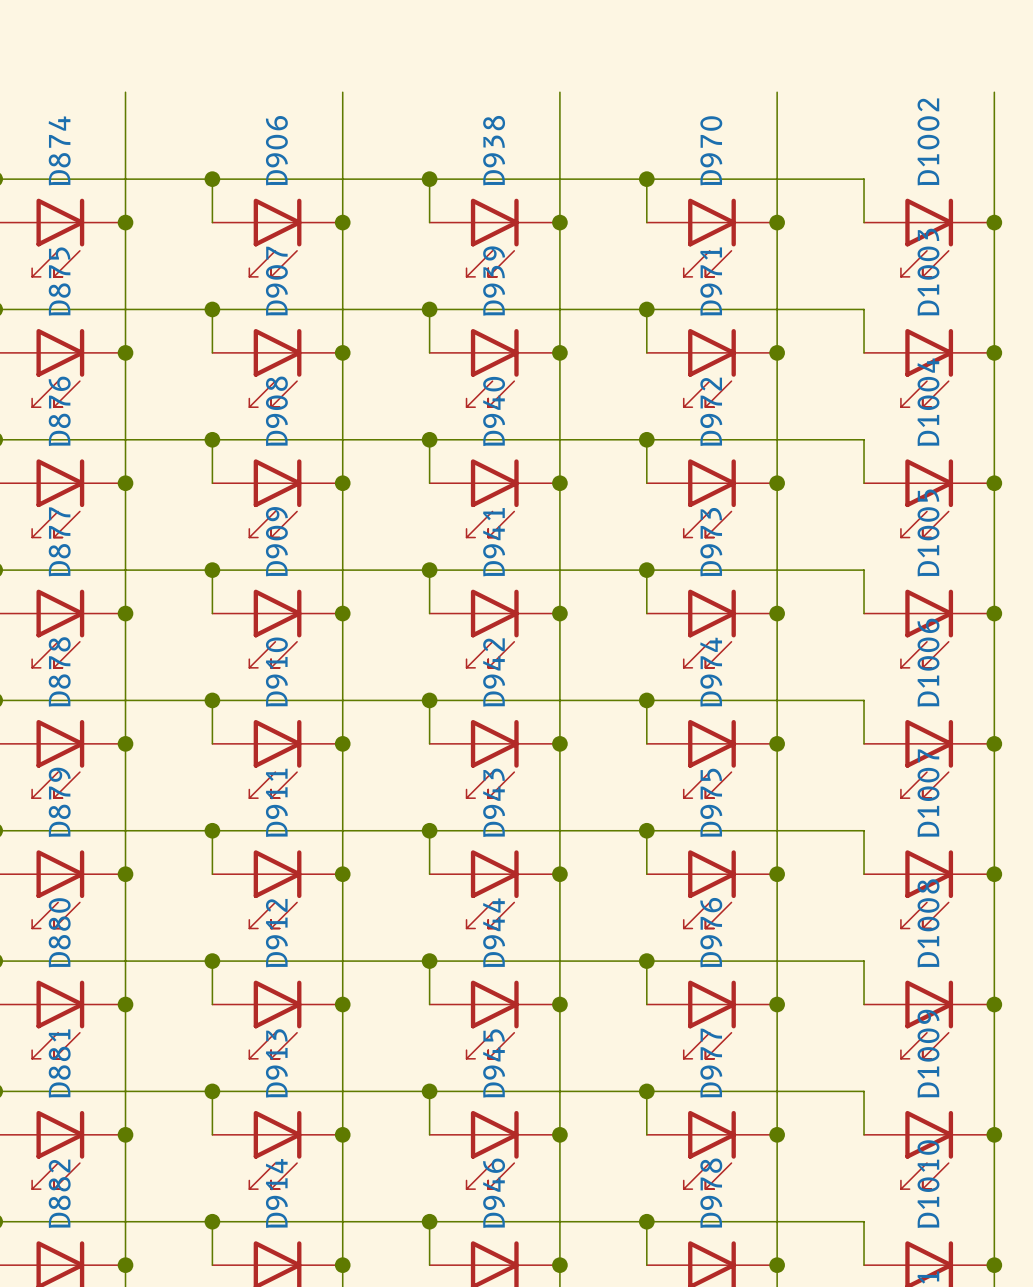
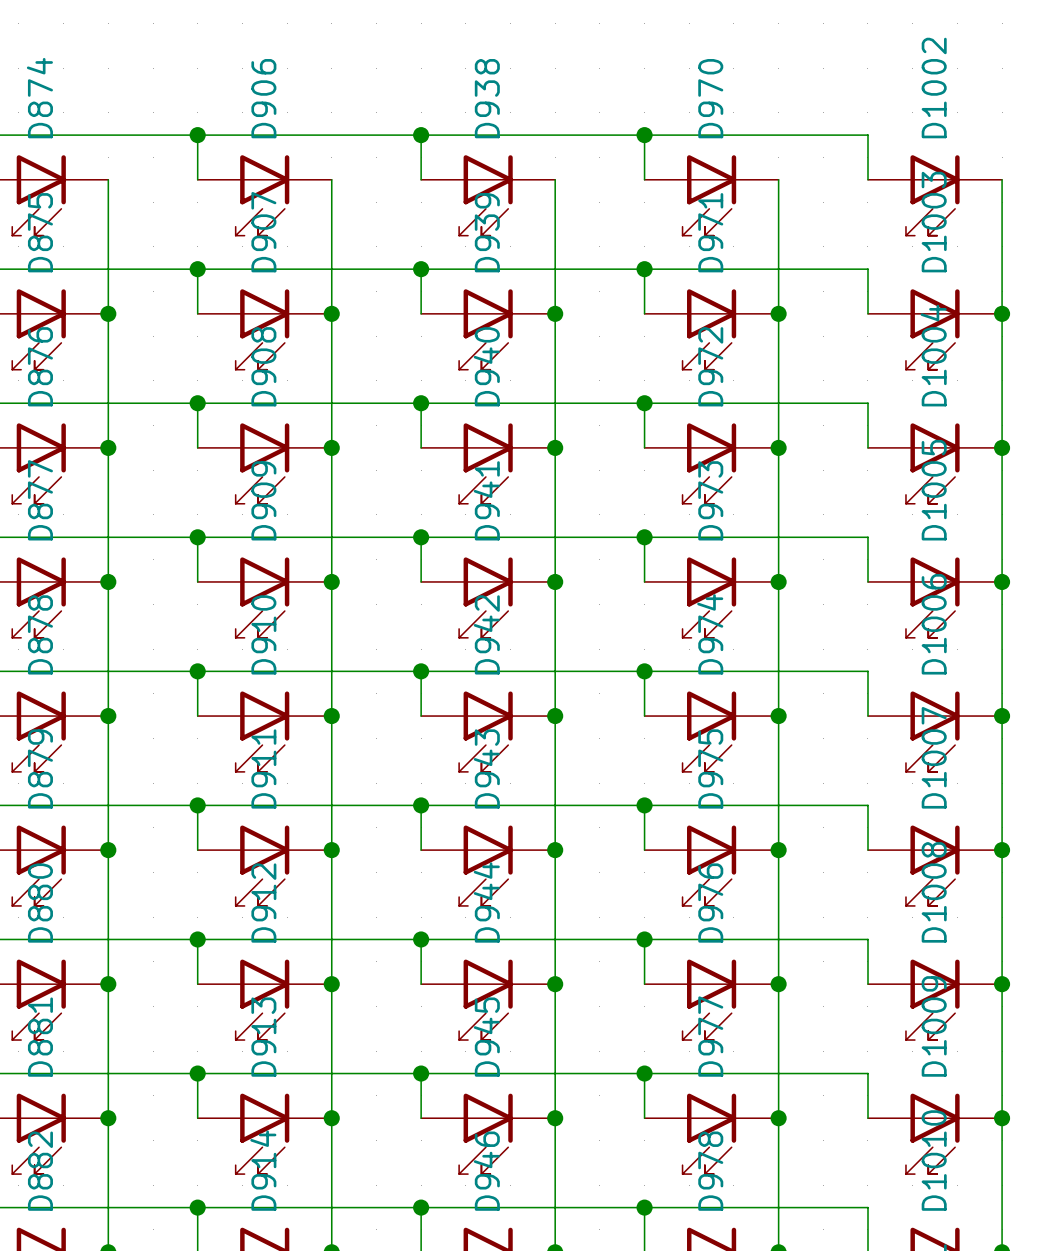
wire: (125, 92) (125, 222) -> none
wire: (342, 92) (342, 222) -> none
wire: (559, 92) (559, 222) -> none
wire: (777, 92) (777, 222) -> none
wire: (994, 92) (994, 222) -> none
junction: (125, 222) -> none
junction: (342, 222) -> none
junction: (559, 222) -> none
junction: (777, 222) -> none
junction: (994, 222) -> none

